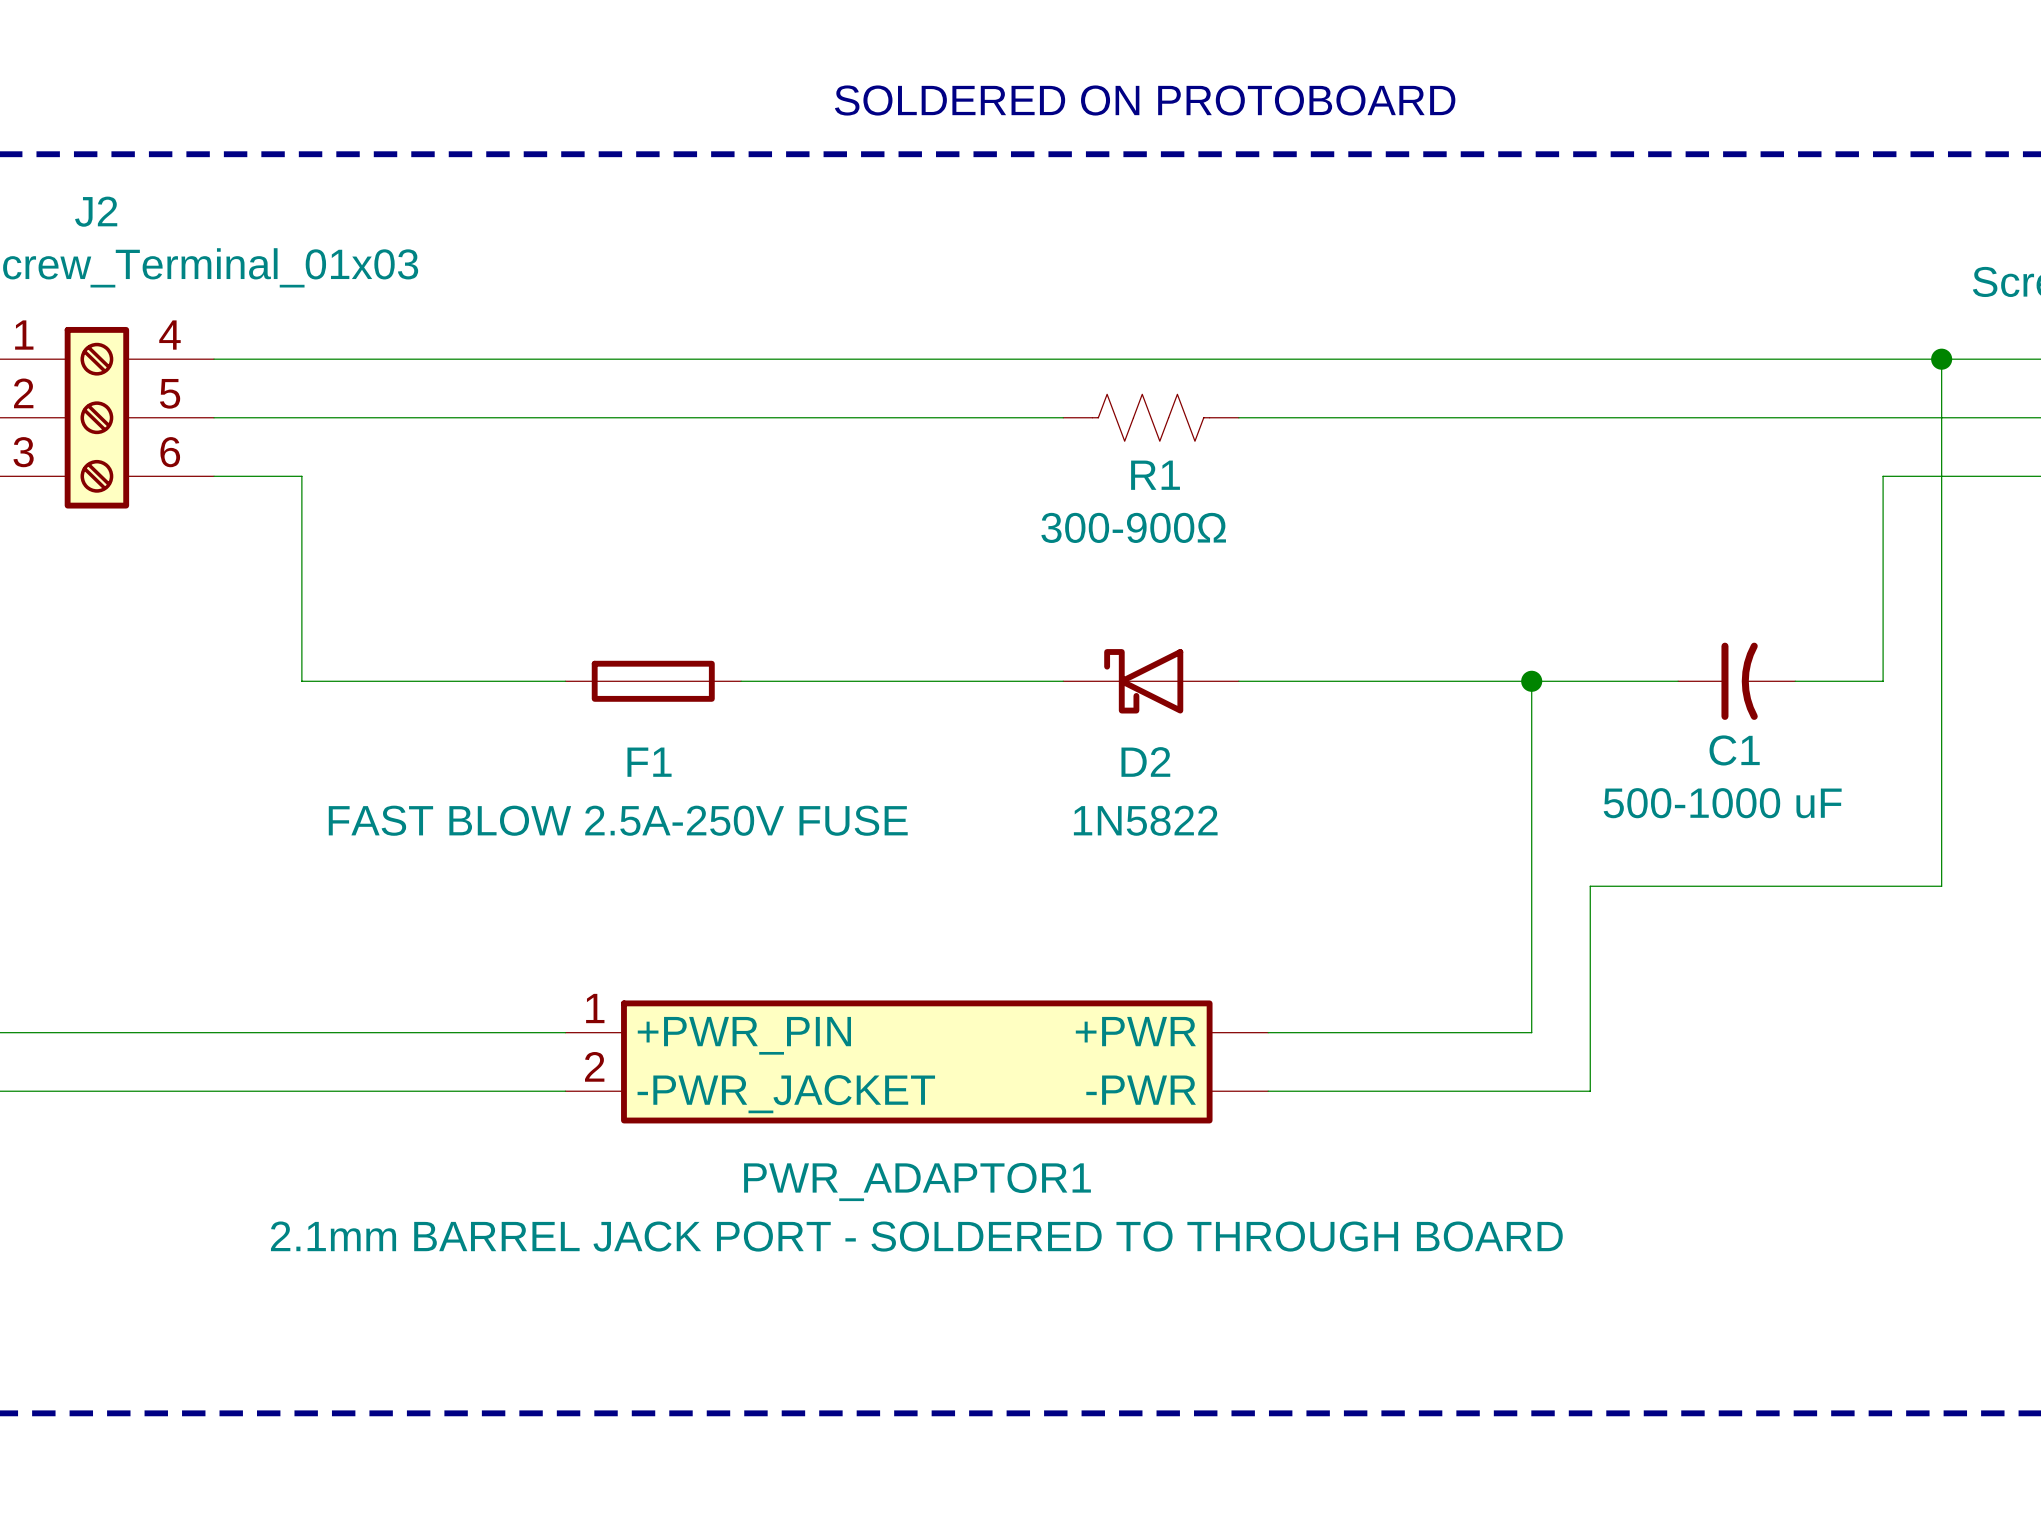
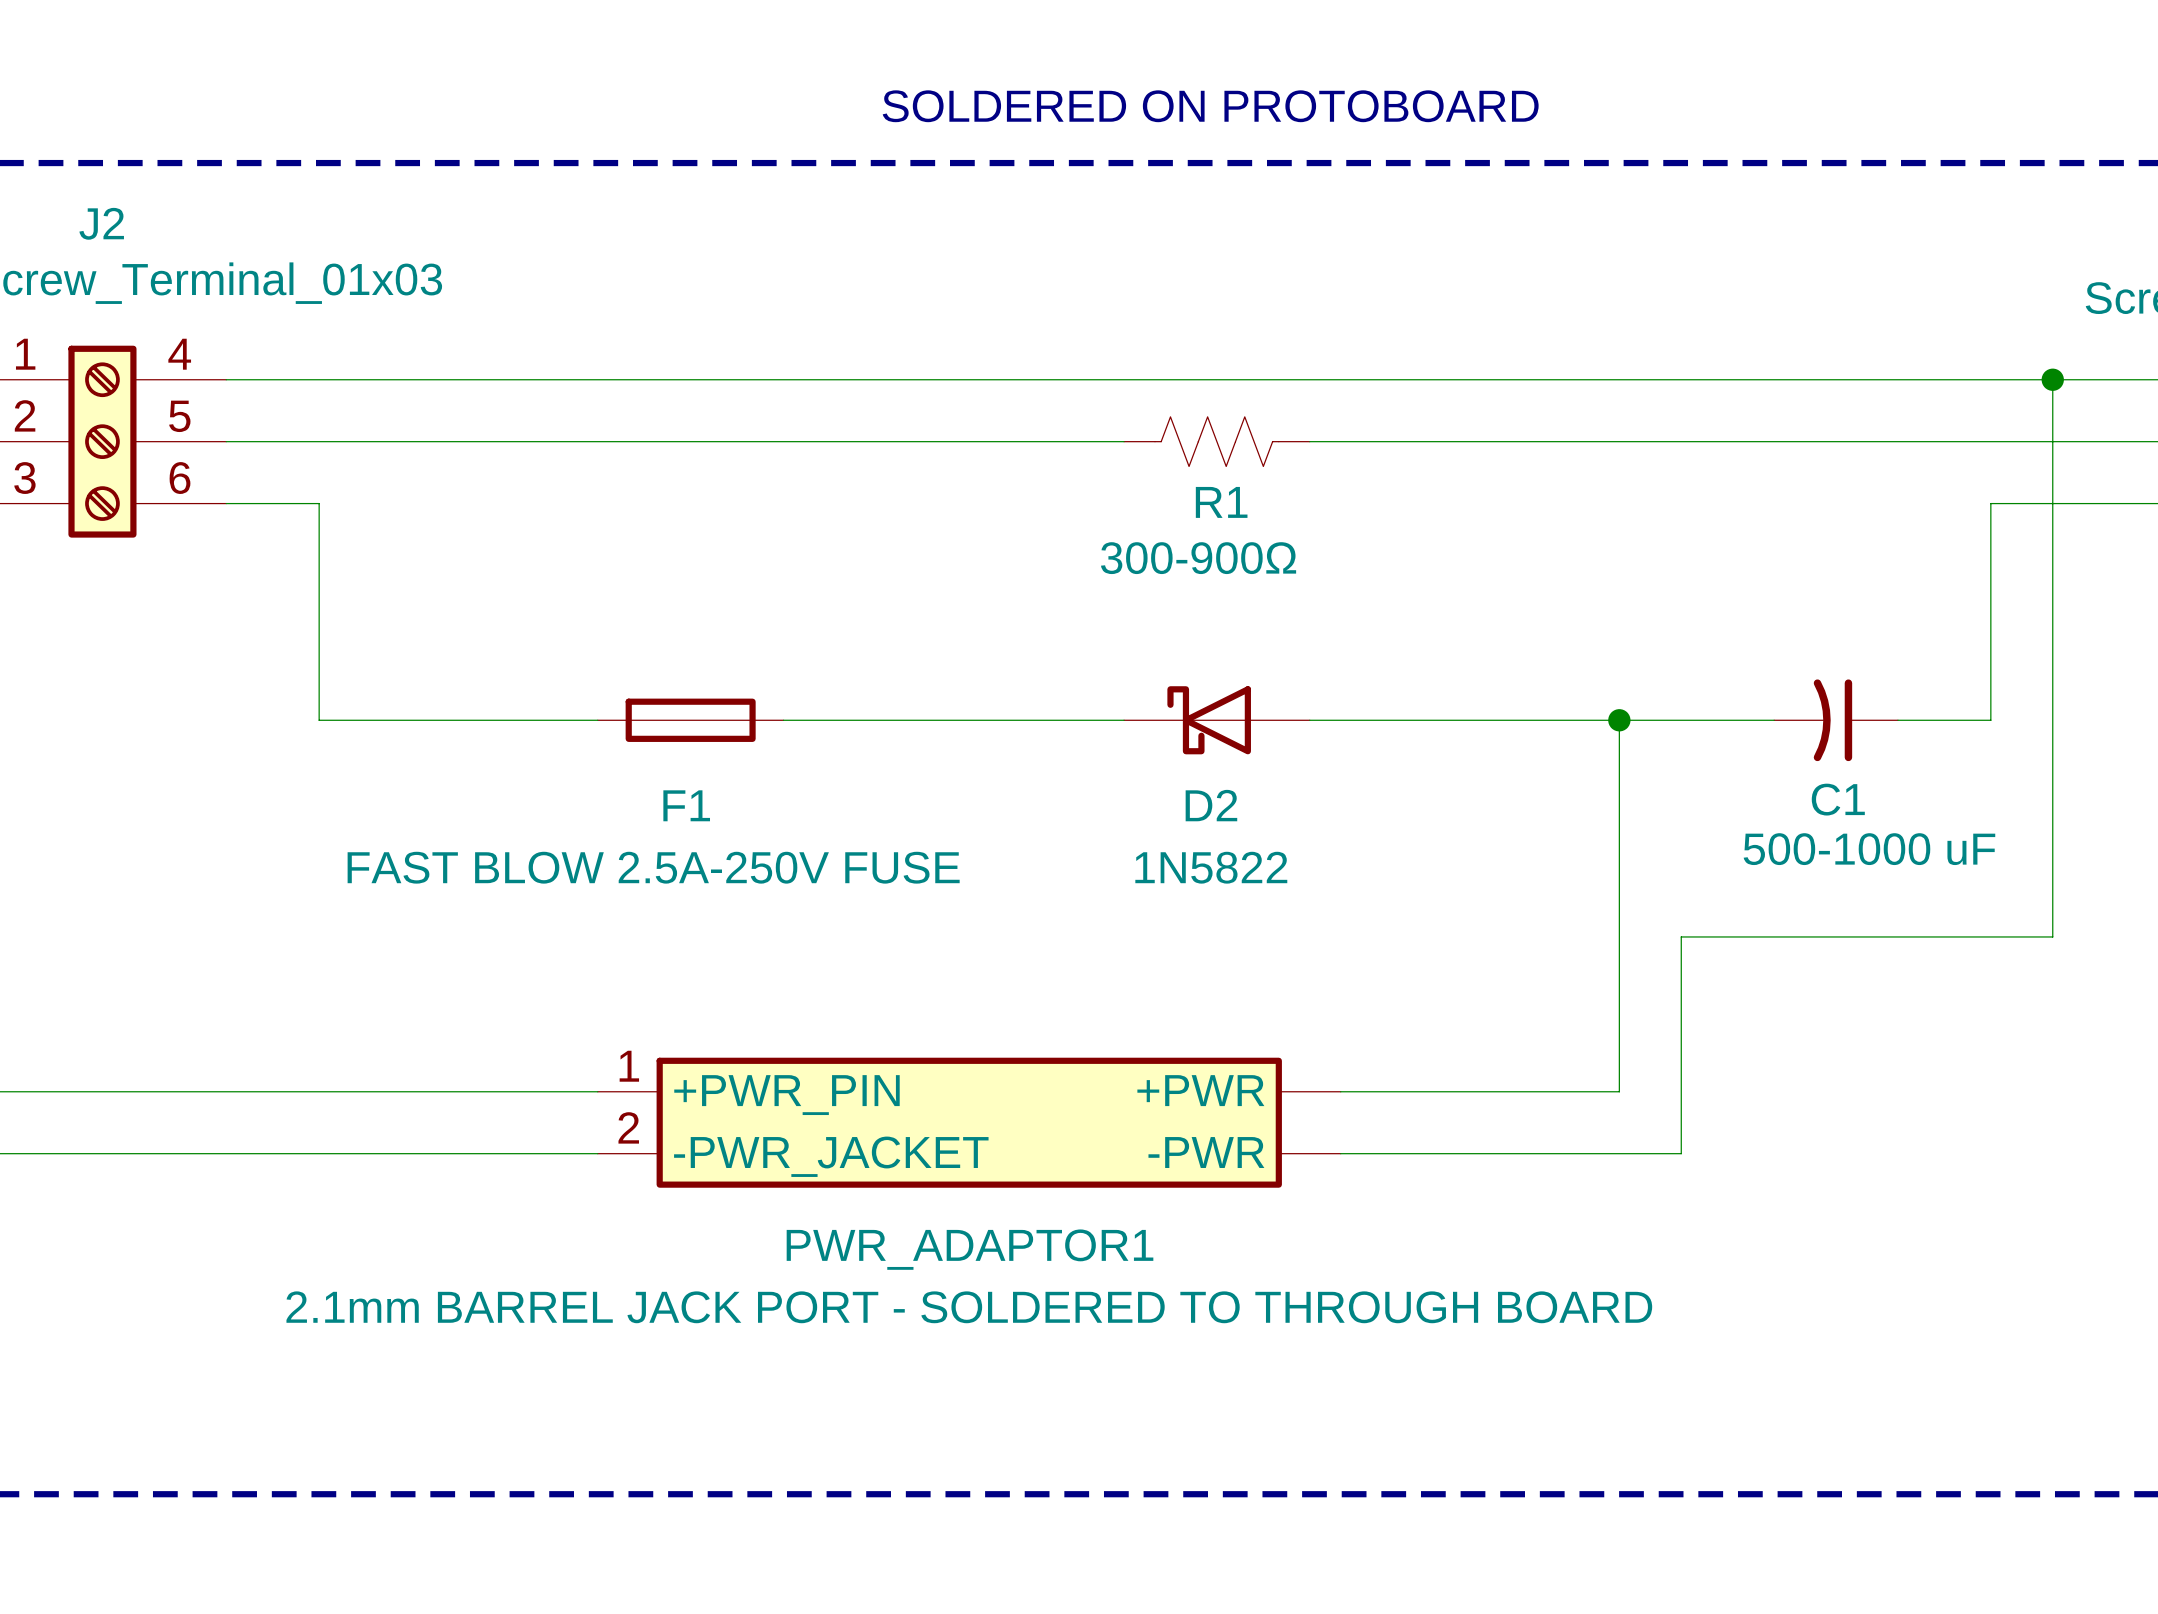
C1 rotation: 0° (1739, 681) -> 180° (1832, 720)
C1 value position: 500-1000 uF (1722, 803) -> 500-1000 uF (1869, 849)

